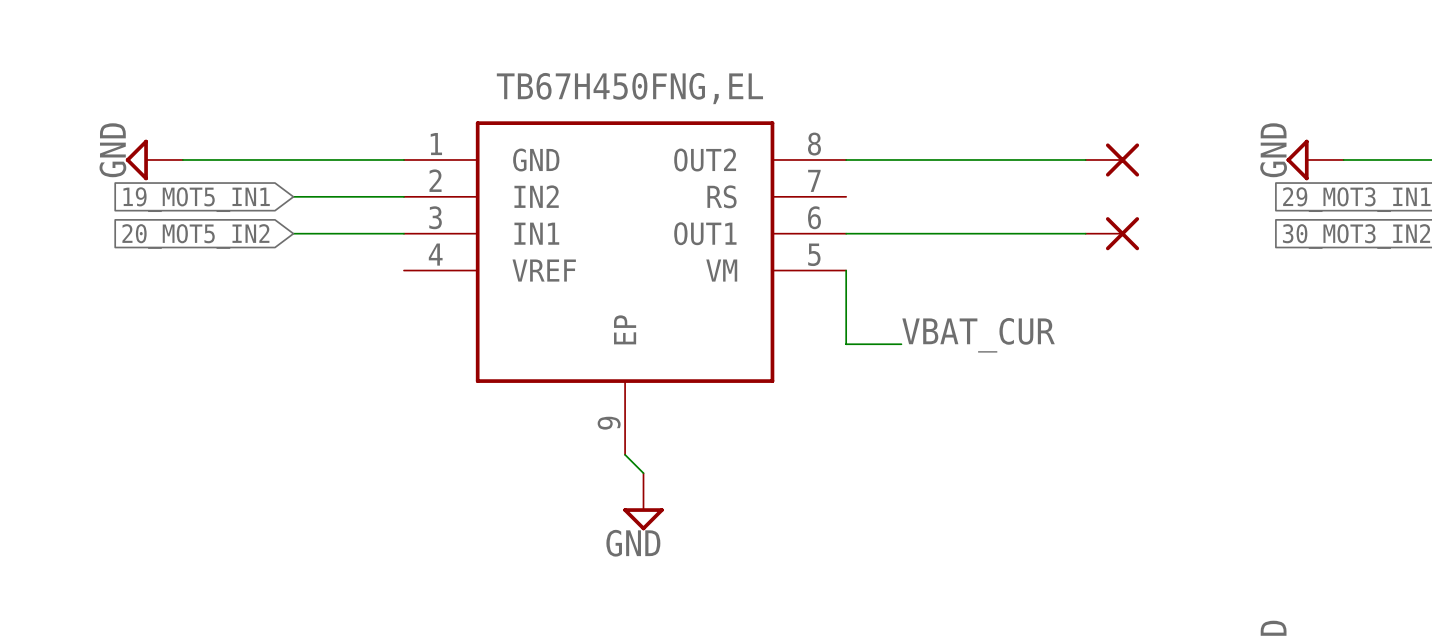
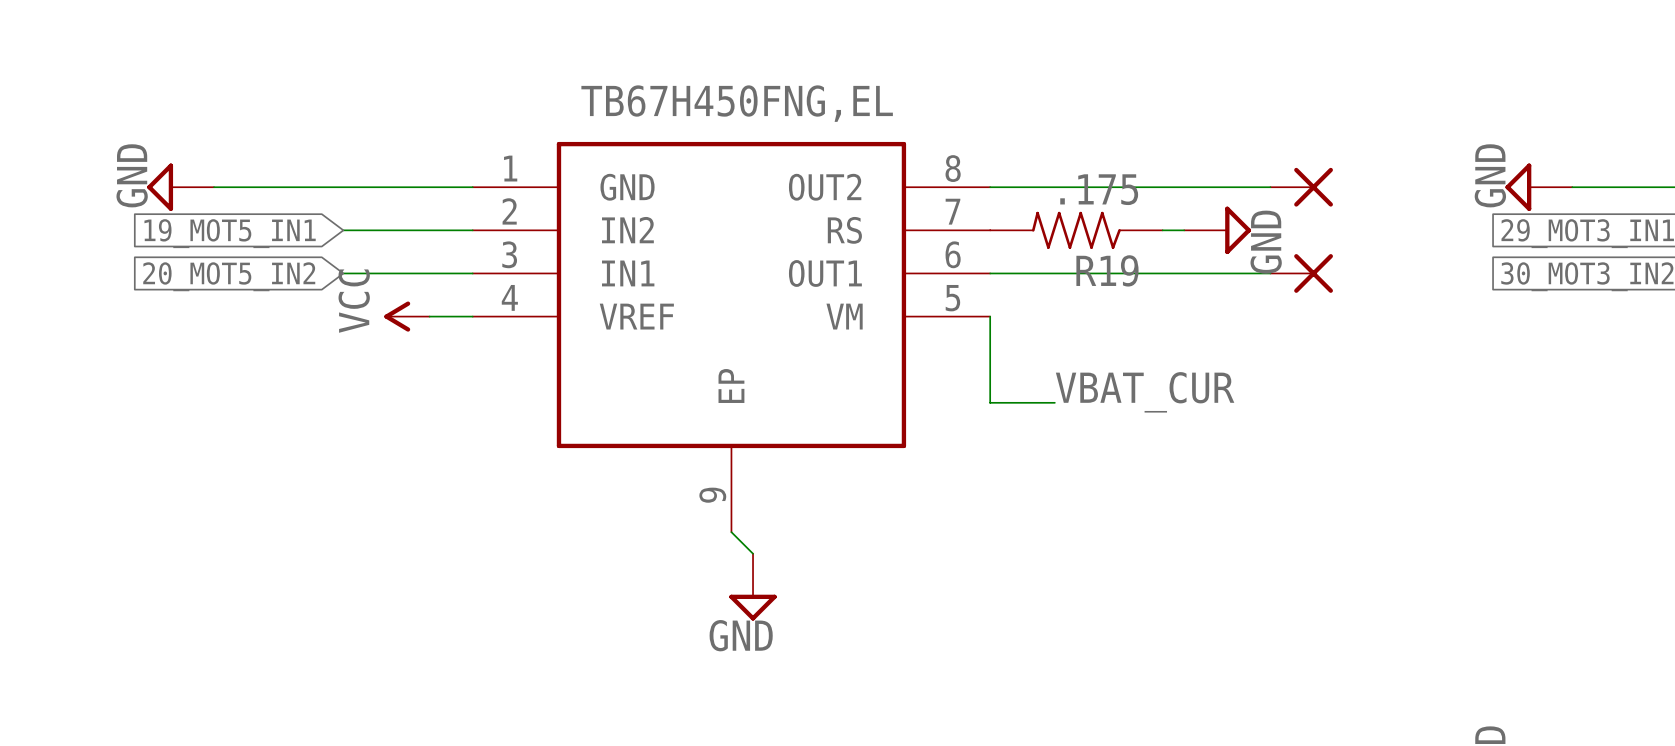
R19: none -> .175 (1076, 230)
wire: none -> (1162, 230) (1184, 230)
power symbol: none -> GND (1217, 230)
power symbol: none -> VCC (406, 316)
wire: none -> (429, 316) (472, 316)

